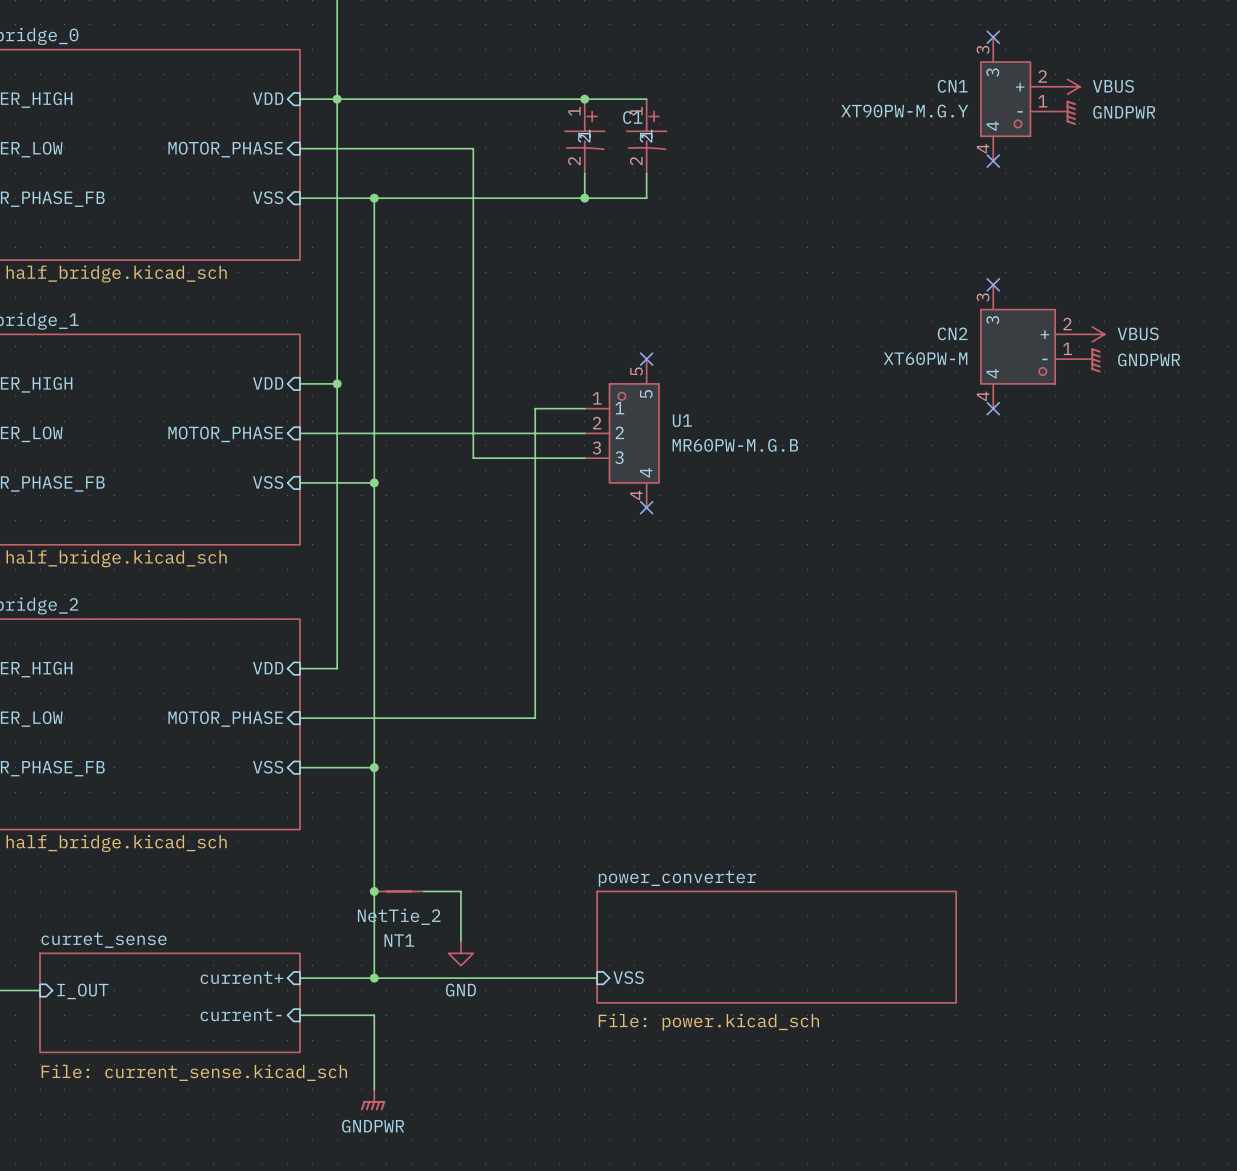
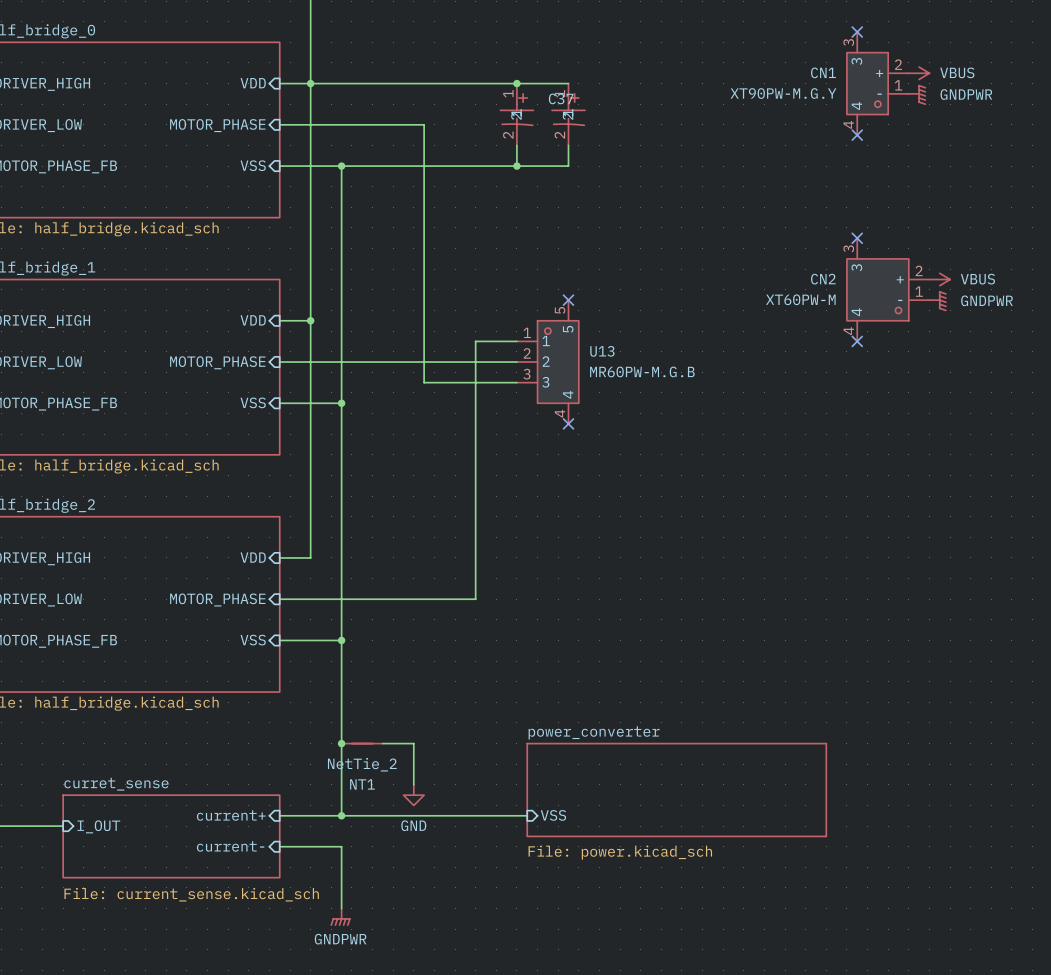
C1 name: C1 (632, 117) -> C37 (561, 98)
U1 name: U1 (682, 420) -> U13 (602, 351)

